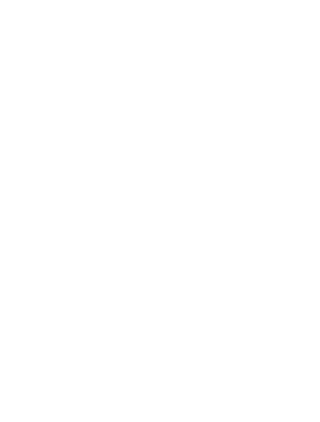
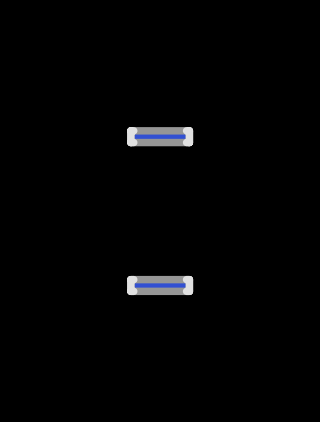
part: none -> (160, 136)
part: none -> (160, 285)

